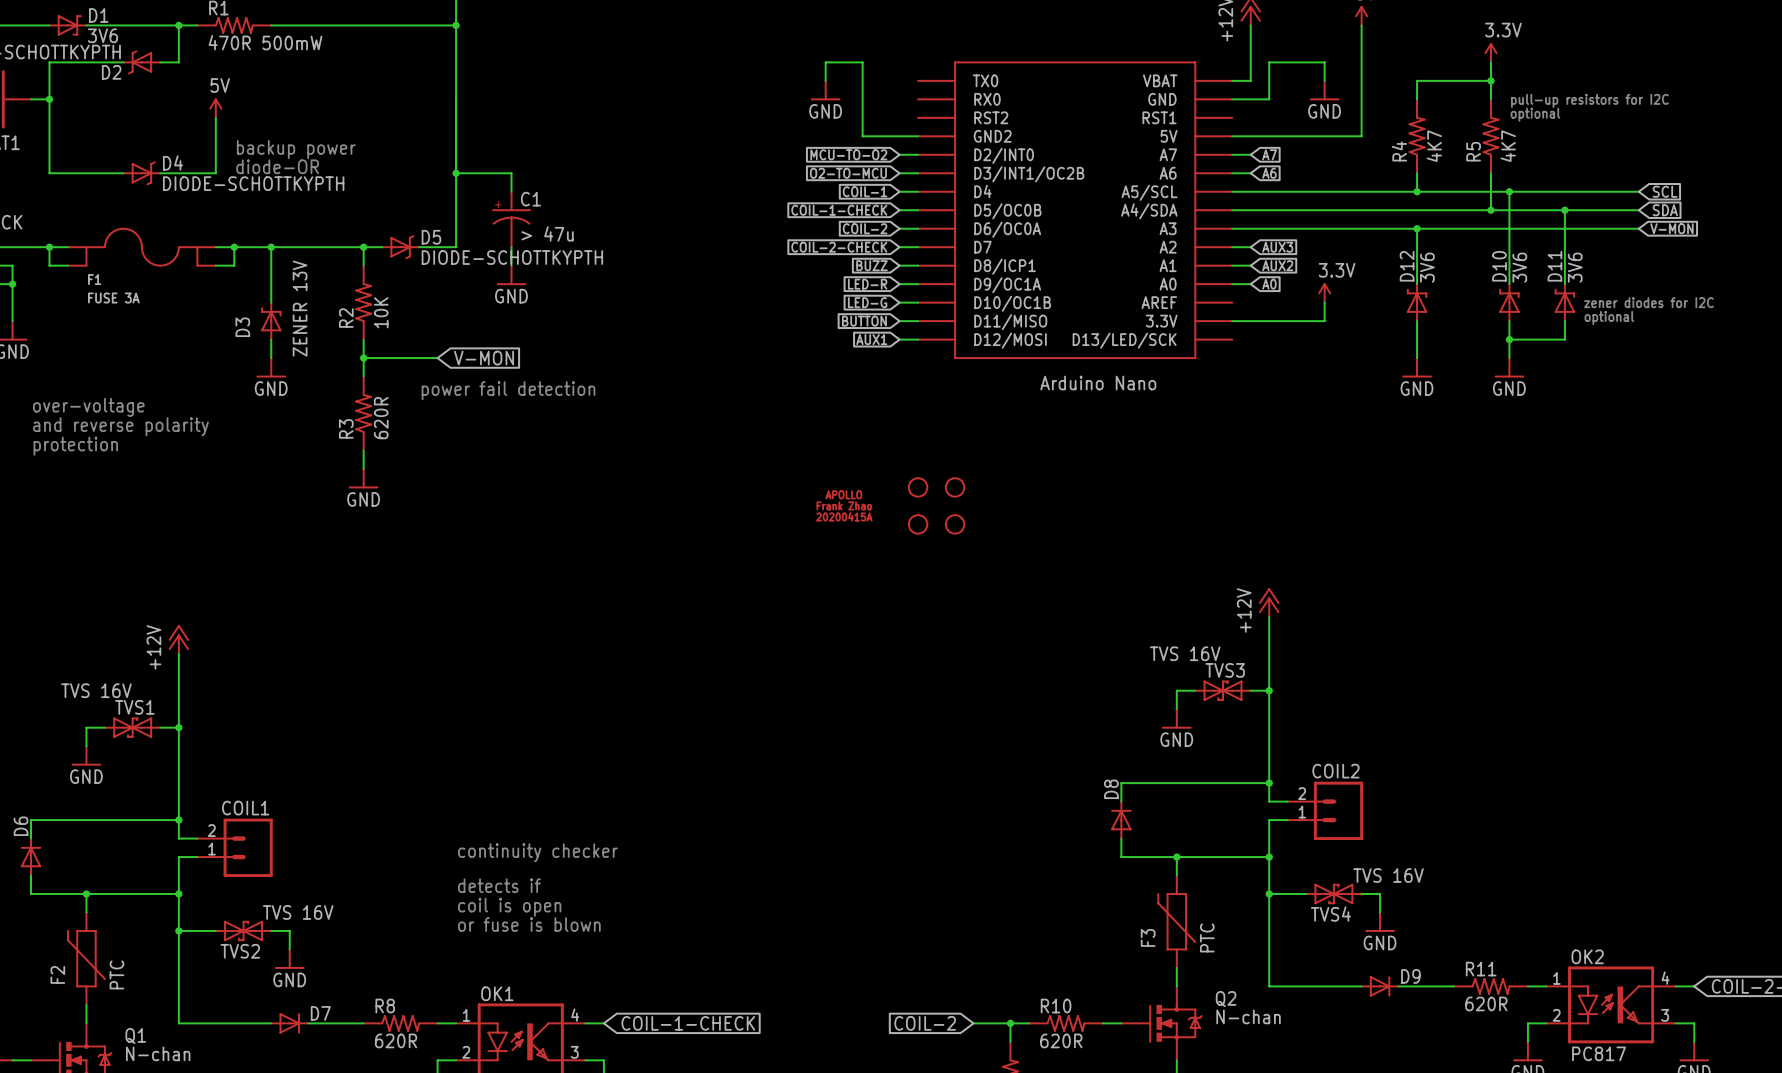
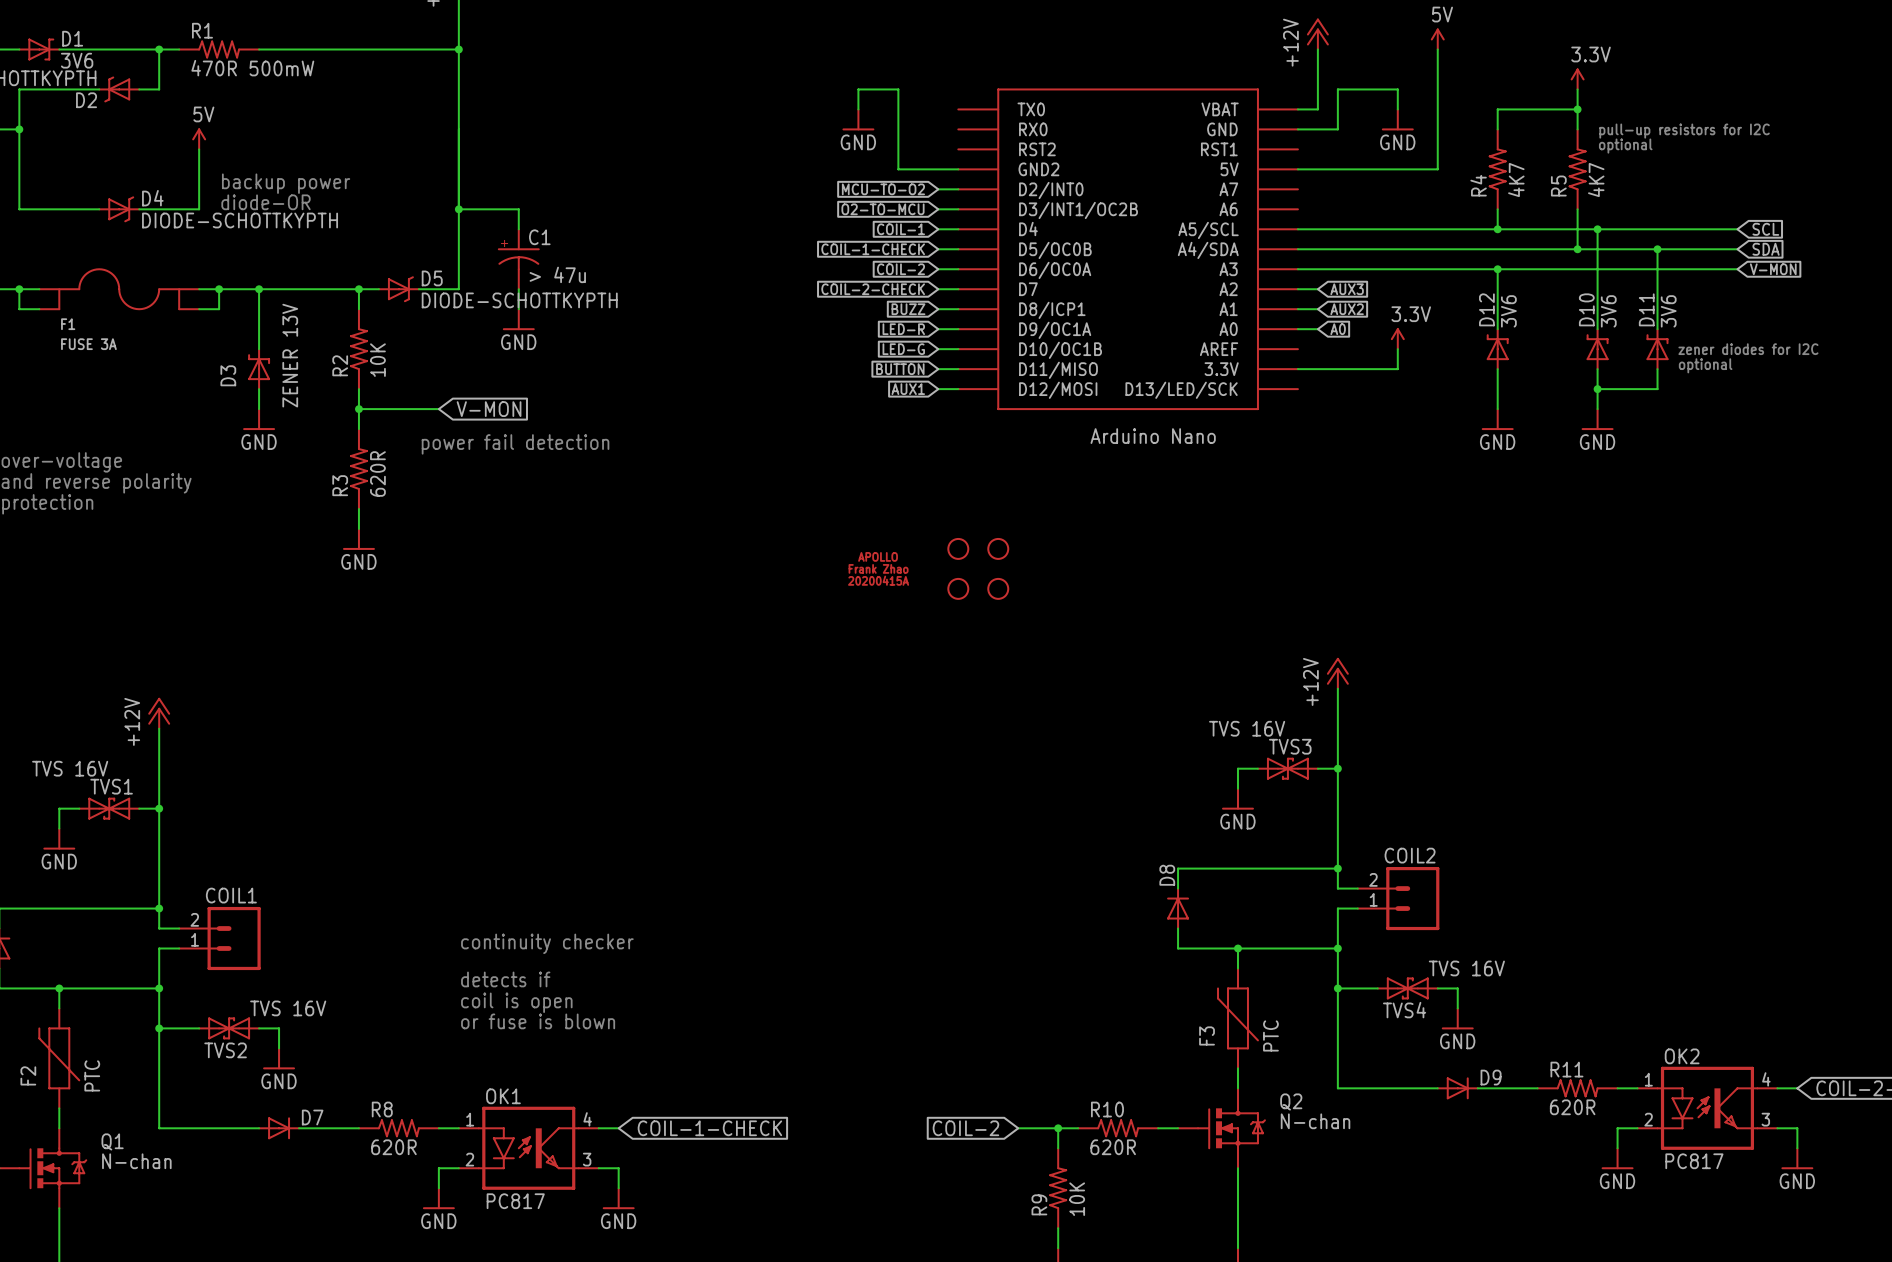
wire: (1232, 154) (1250, 154) -> none
global label: A7 (1269, 154) -> none
wire: (1232, 173) (1250, 173) -> none
global label: A6 (1269, 173) -> none

